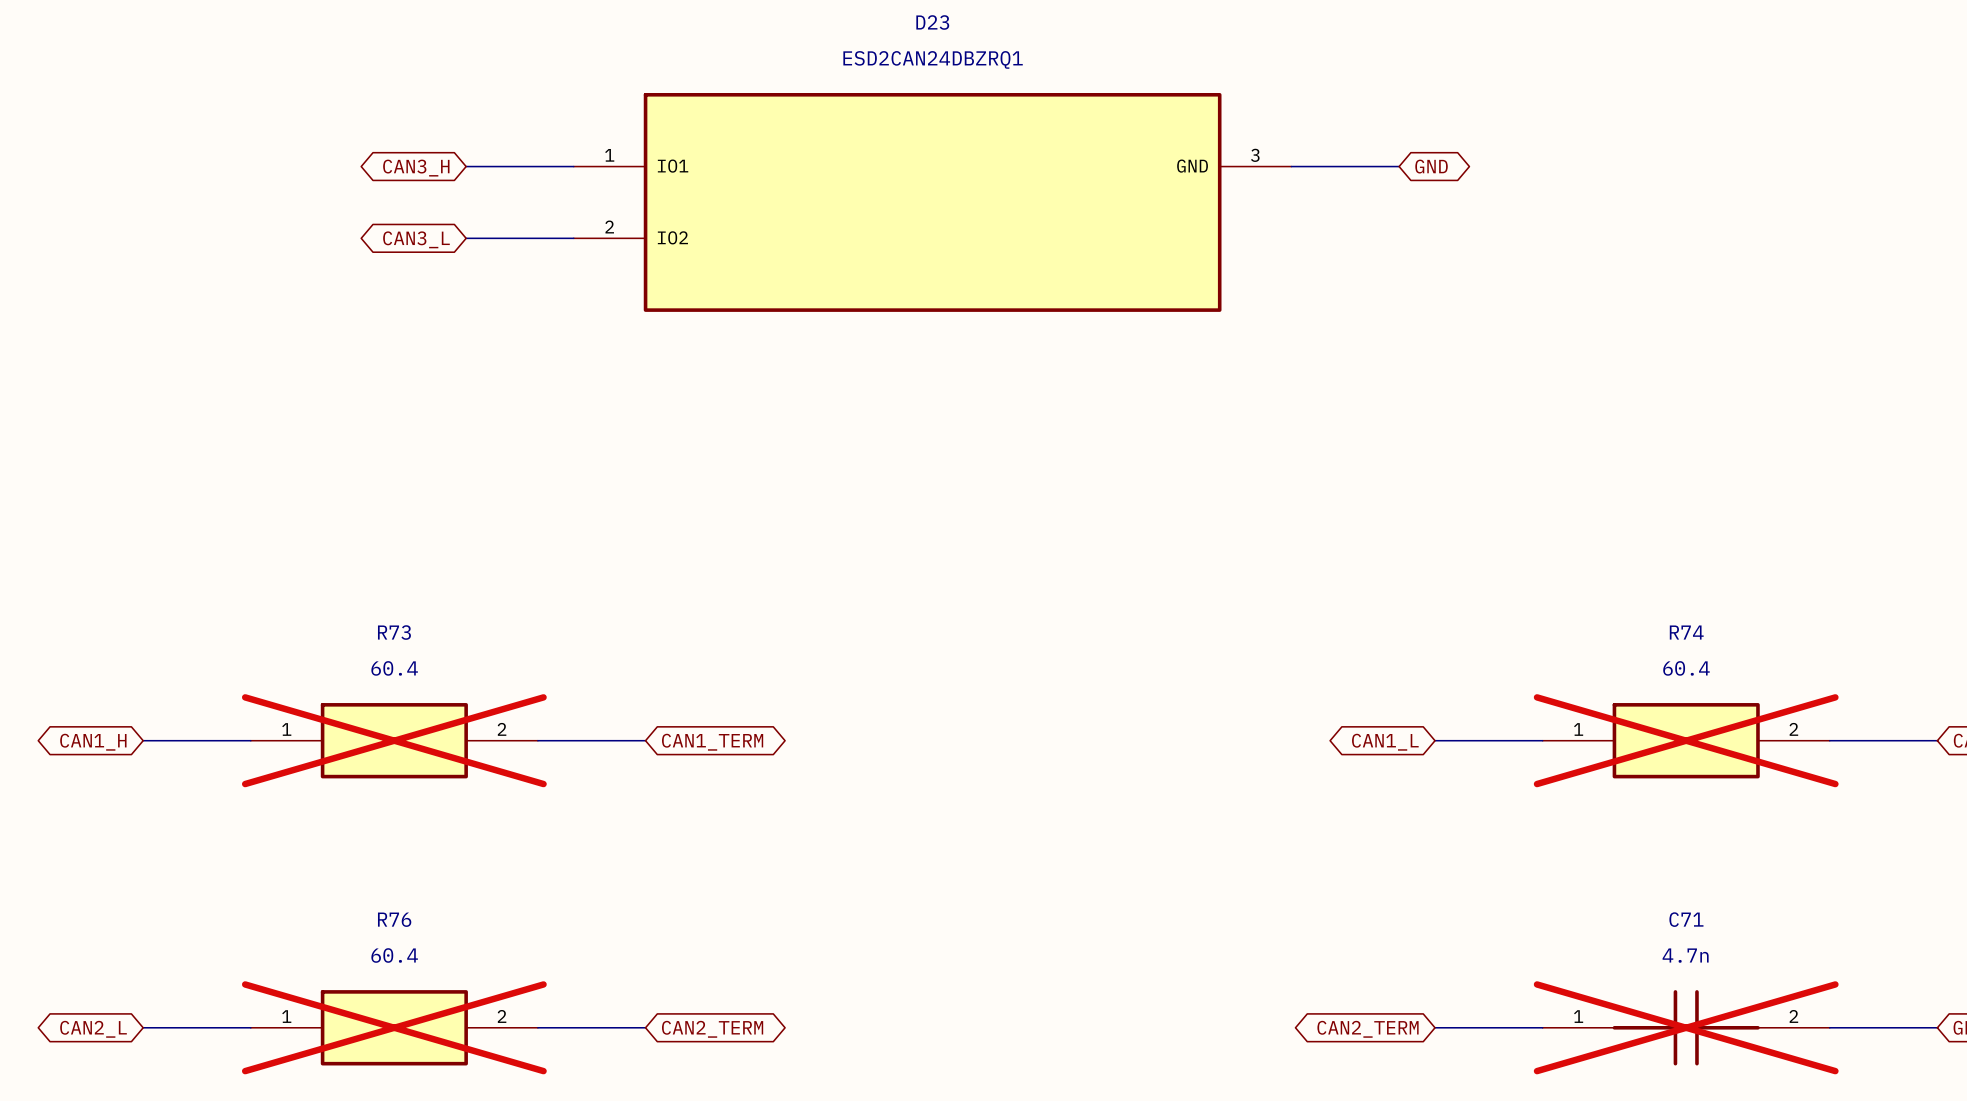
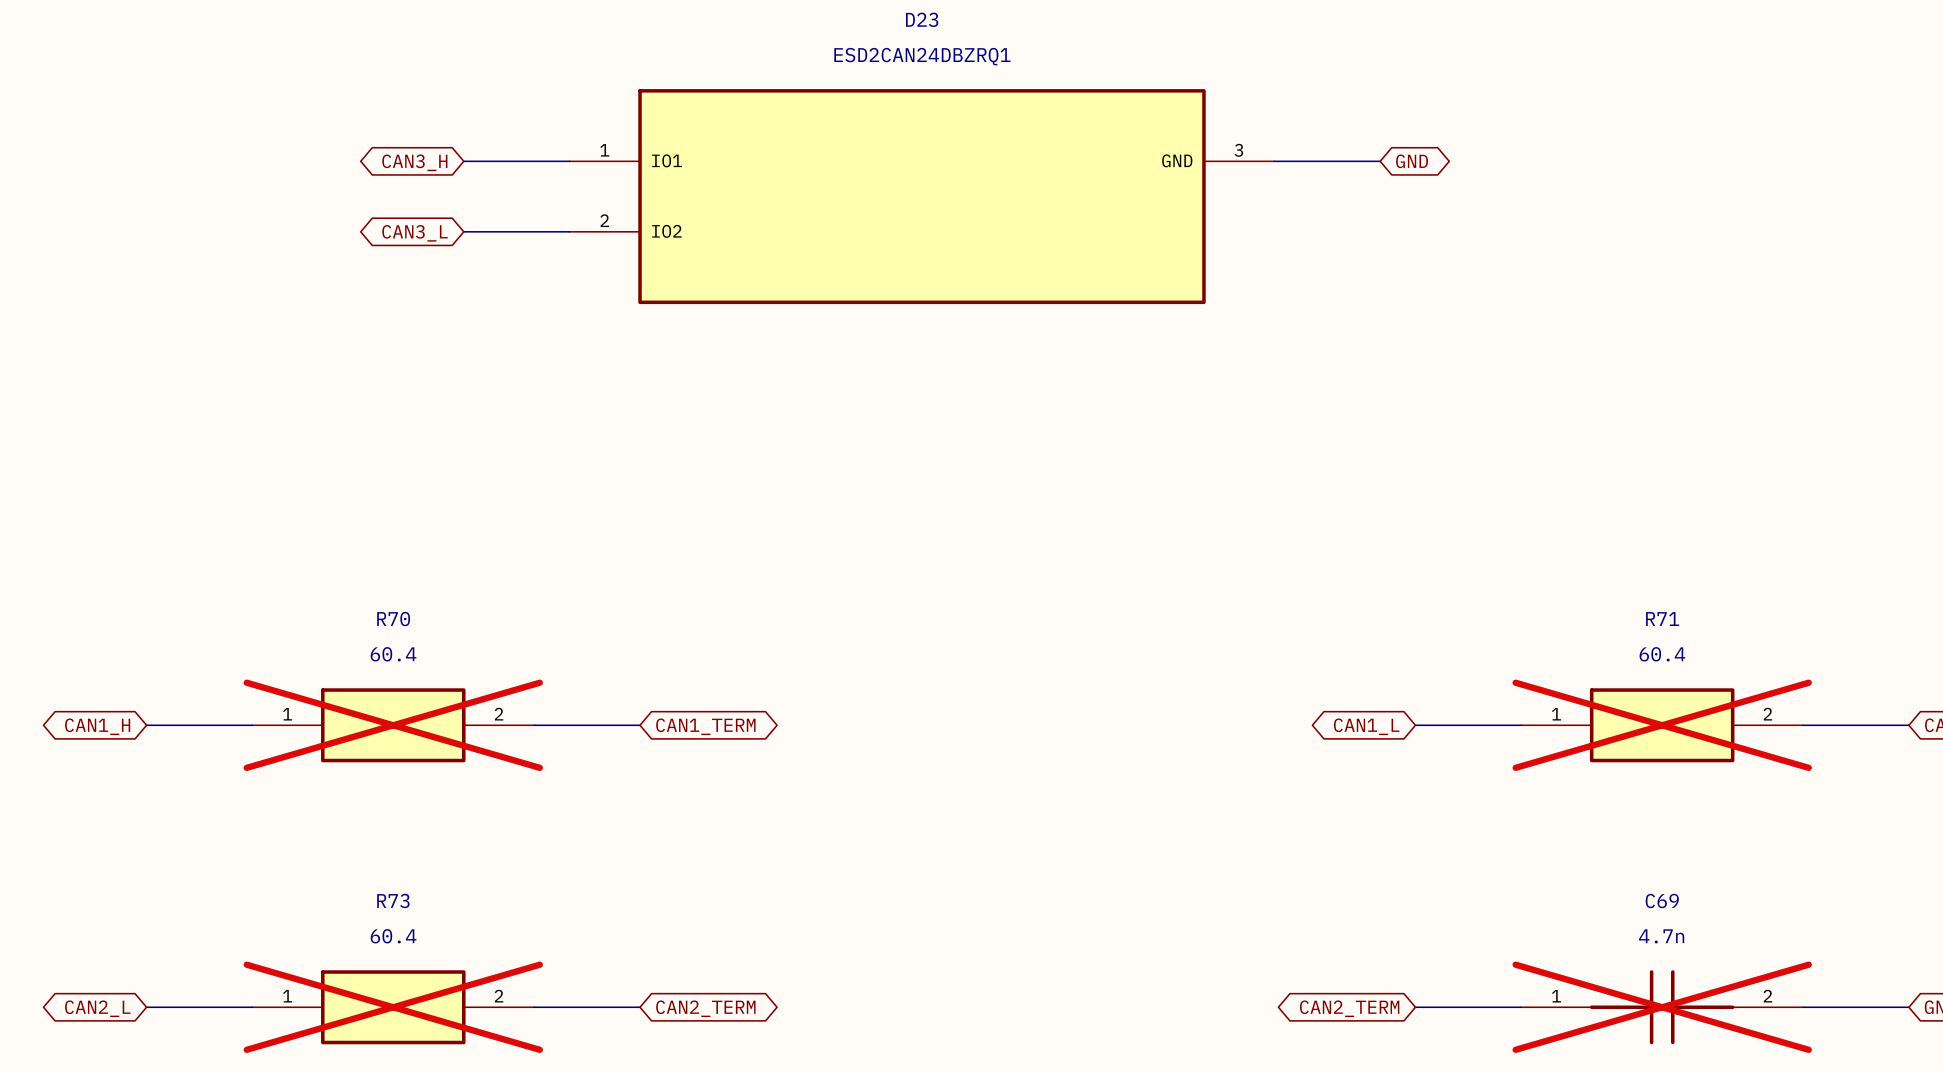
R73 name: R73 (394, 632) -> R70 (393, 619)
R74 name: R74 (1686, 632) -> R71 (1662, 619)
R76 name: R76 (394, 919) -> R73 (393, 901)
C71 name: C71 (1686, 919) -> C69 (1662, 901)

